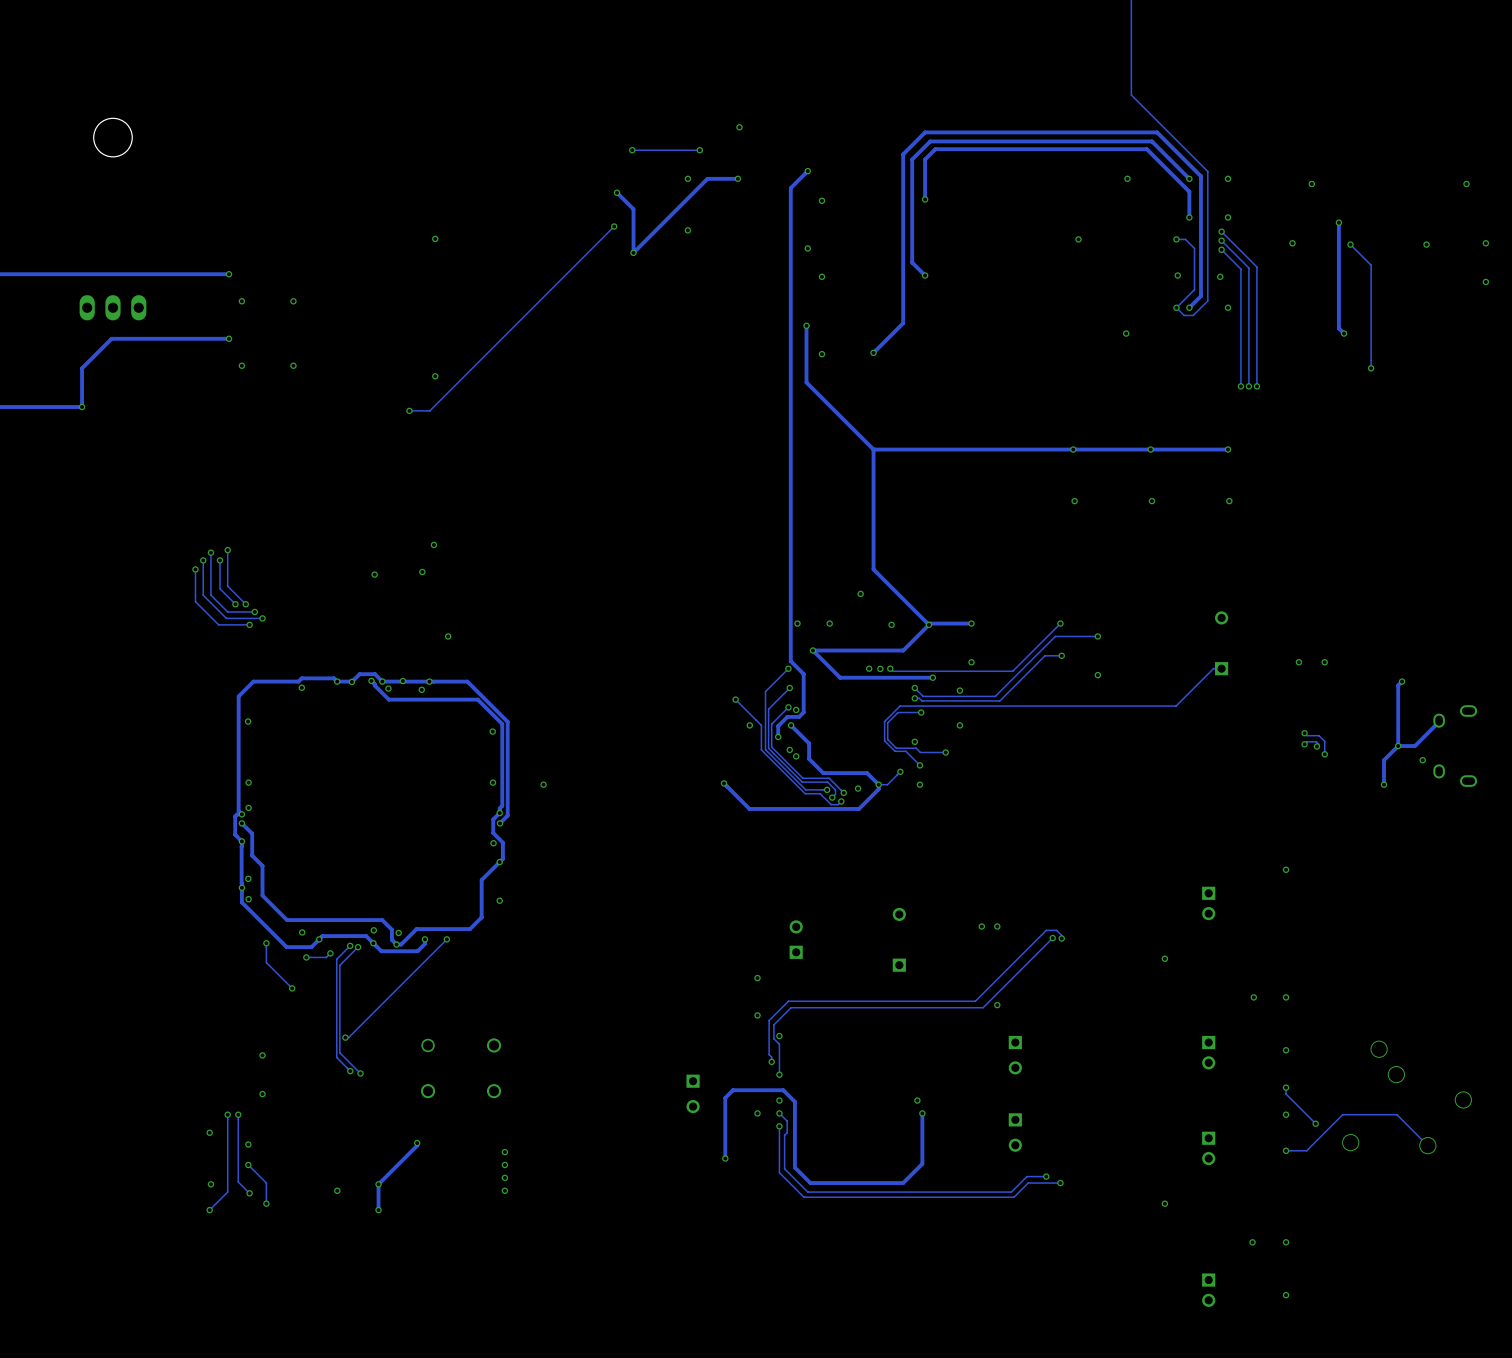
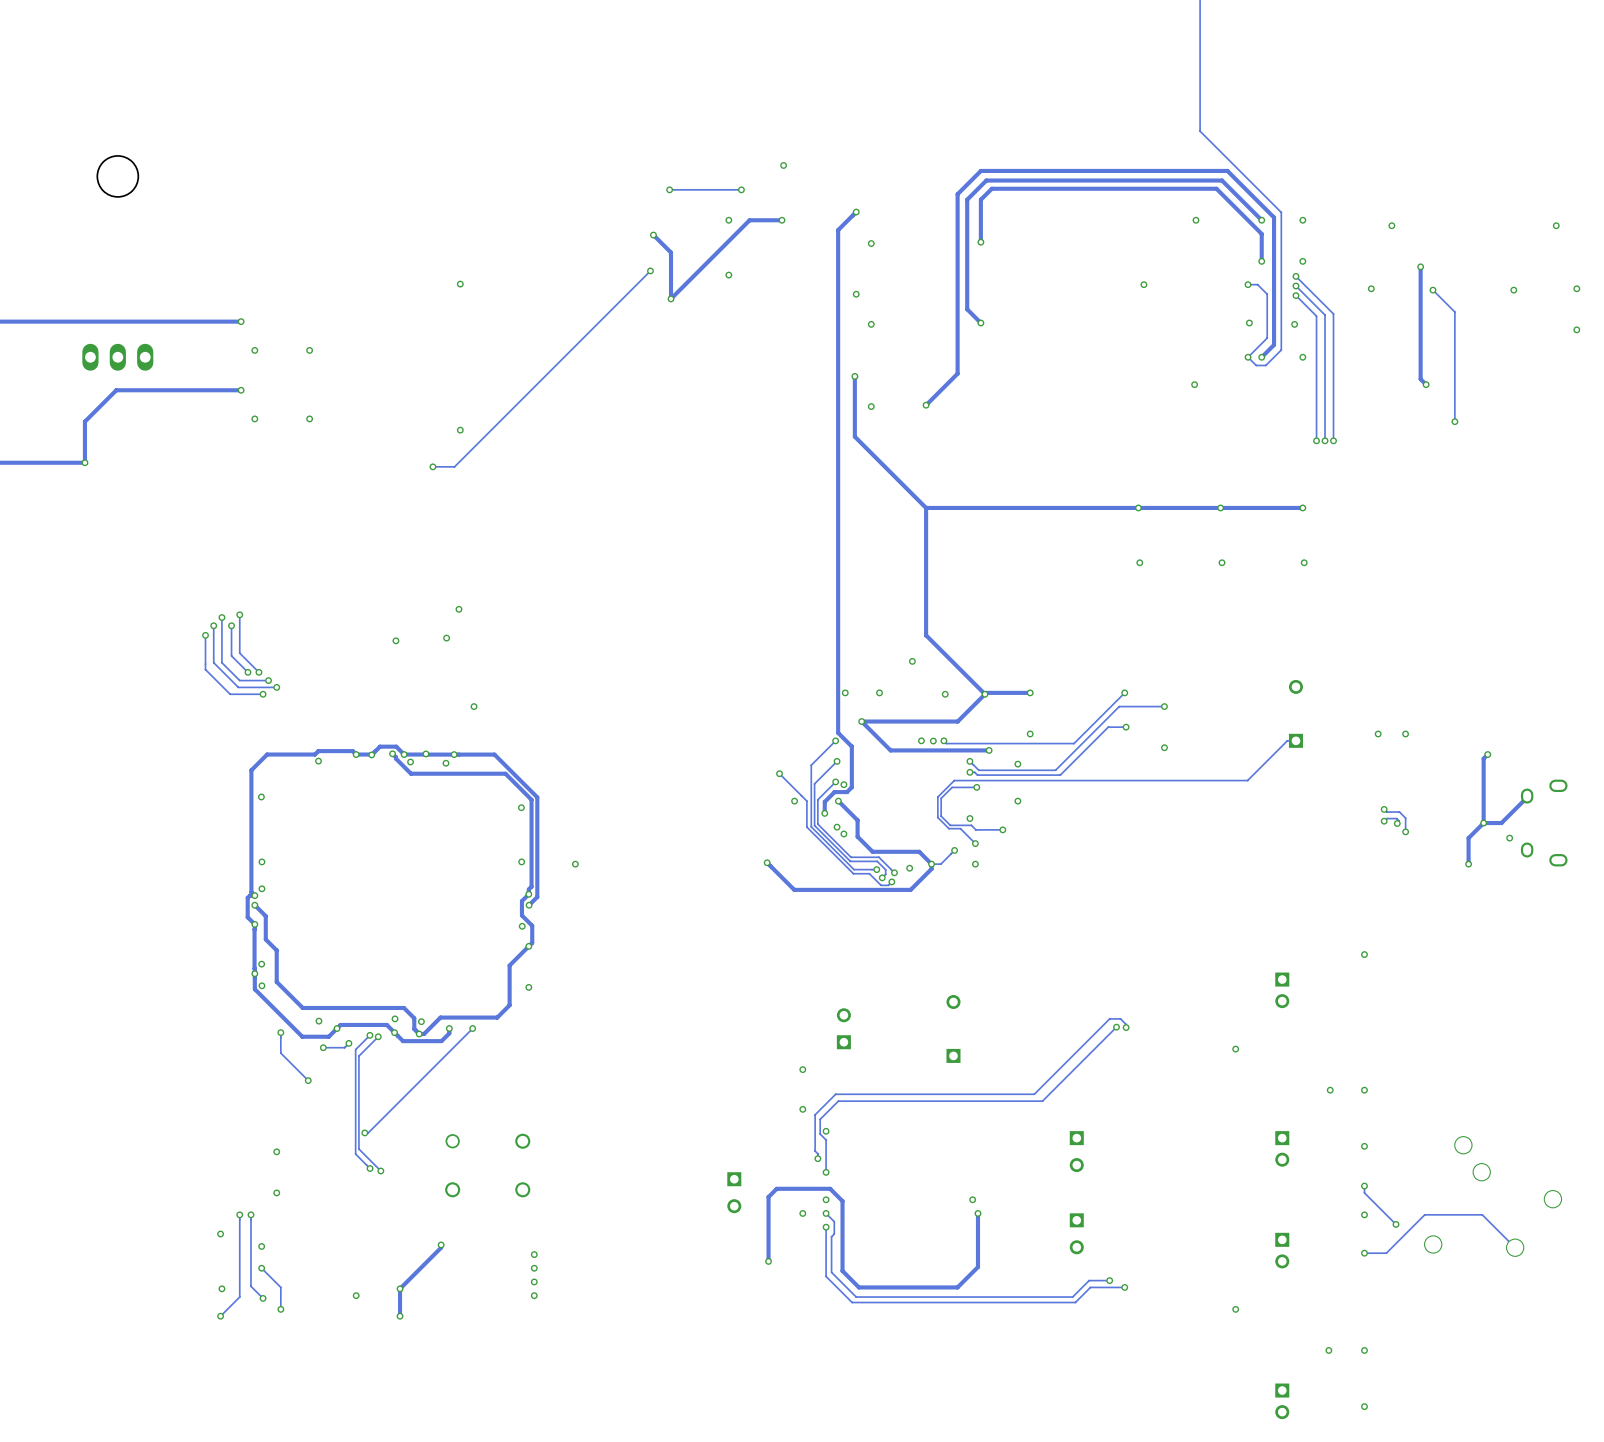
via: (981, 926) -> none
via: (997, 926) -> none
via: (997, 1005) -> none

